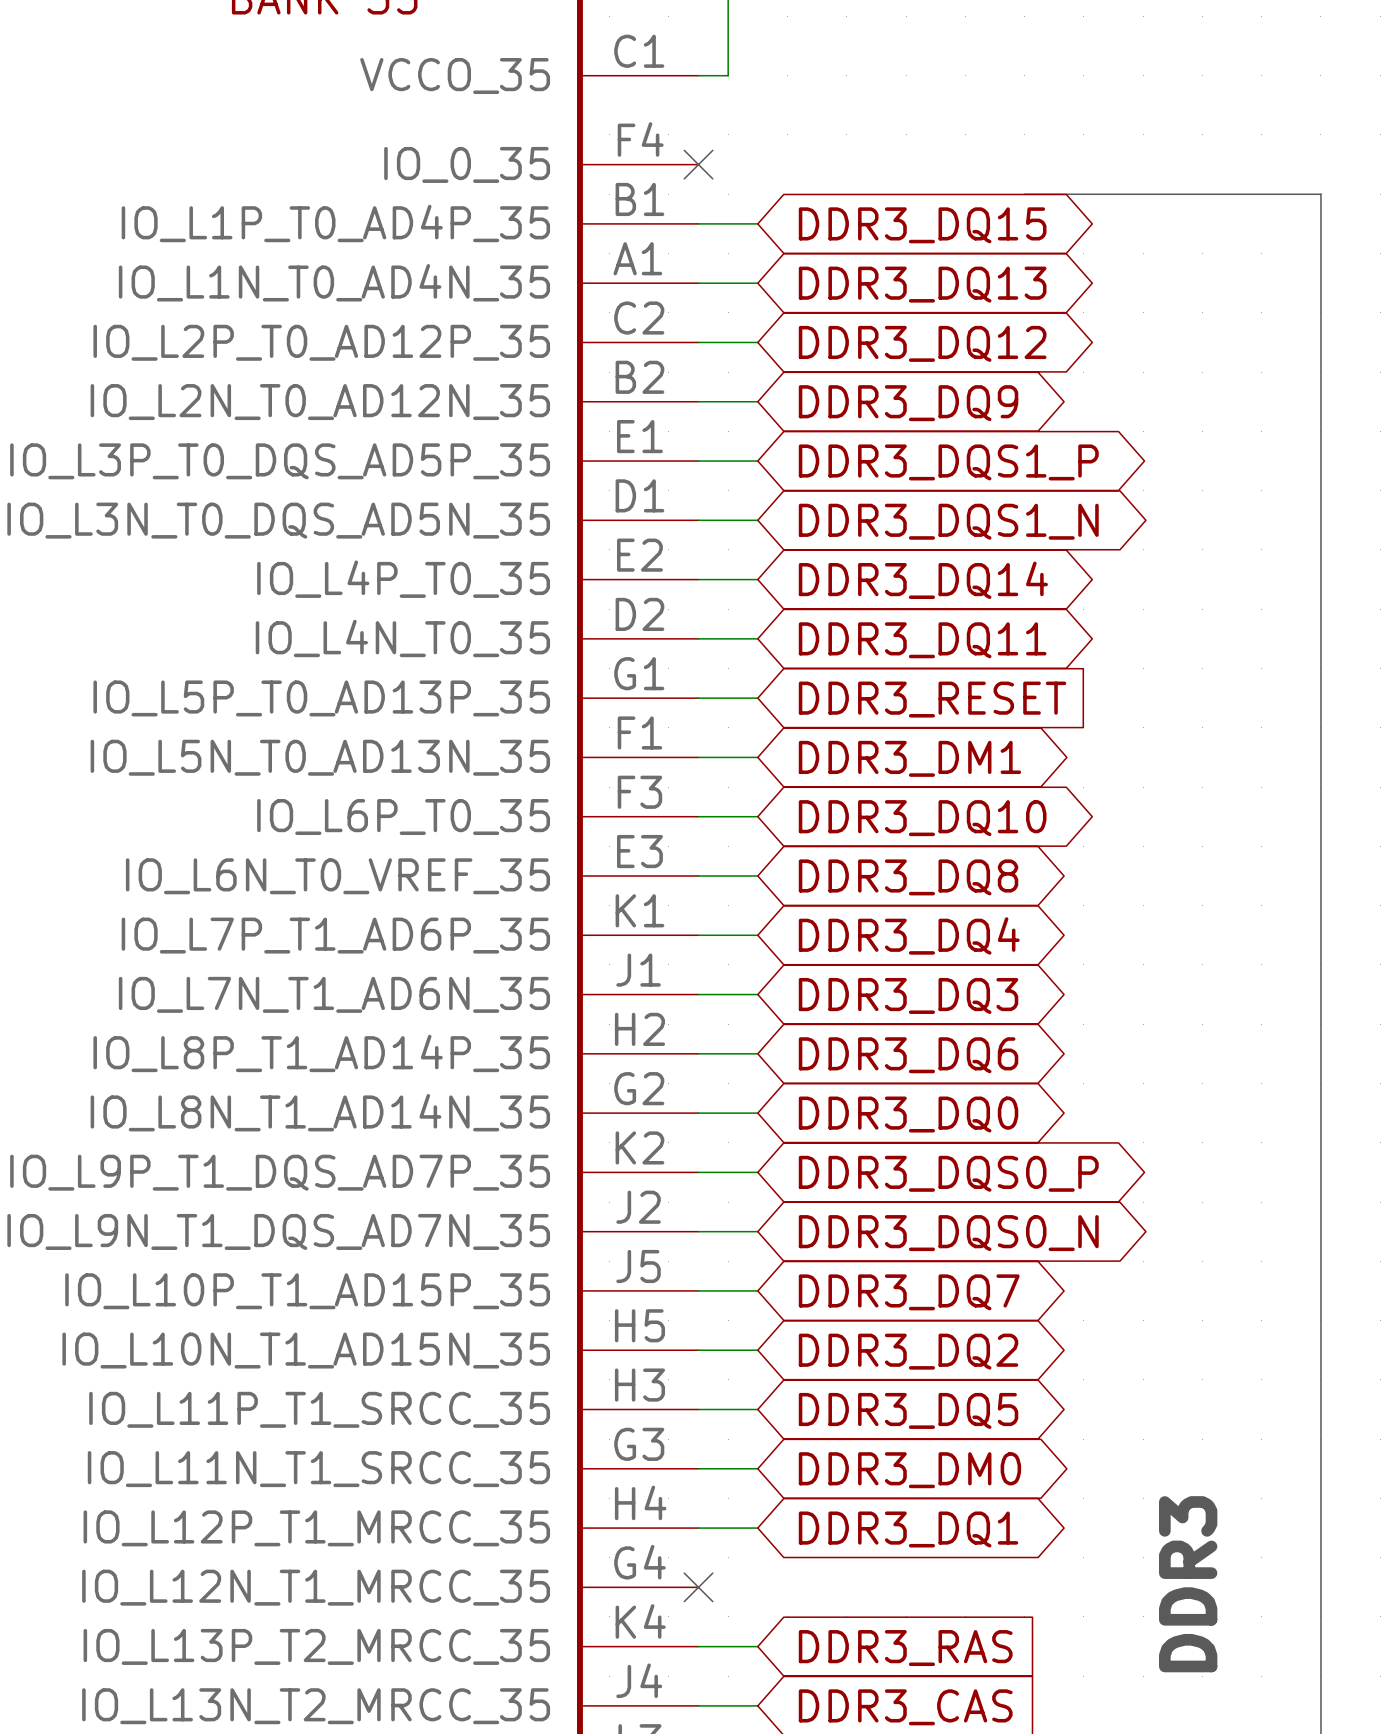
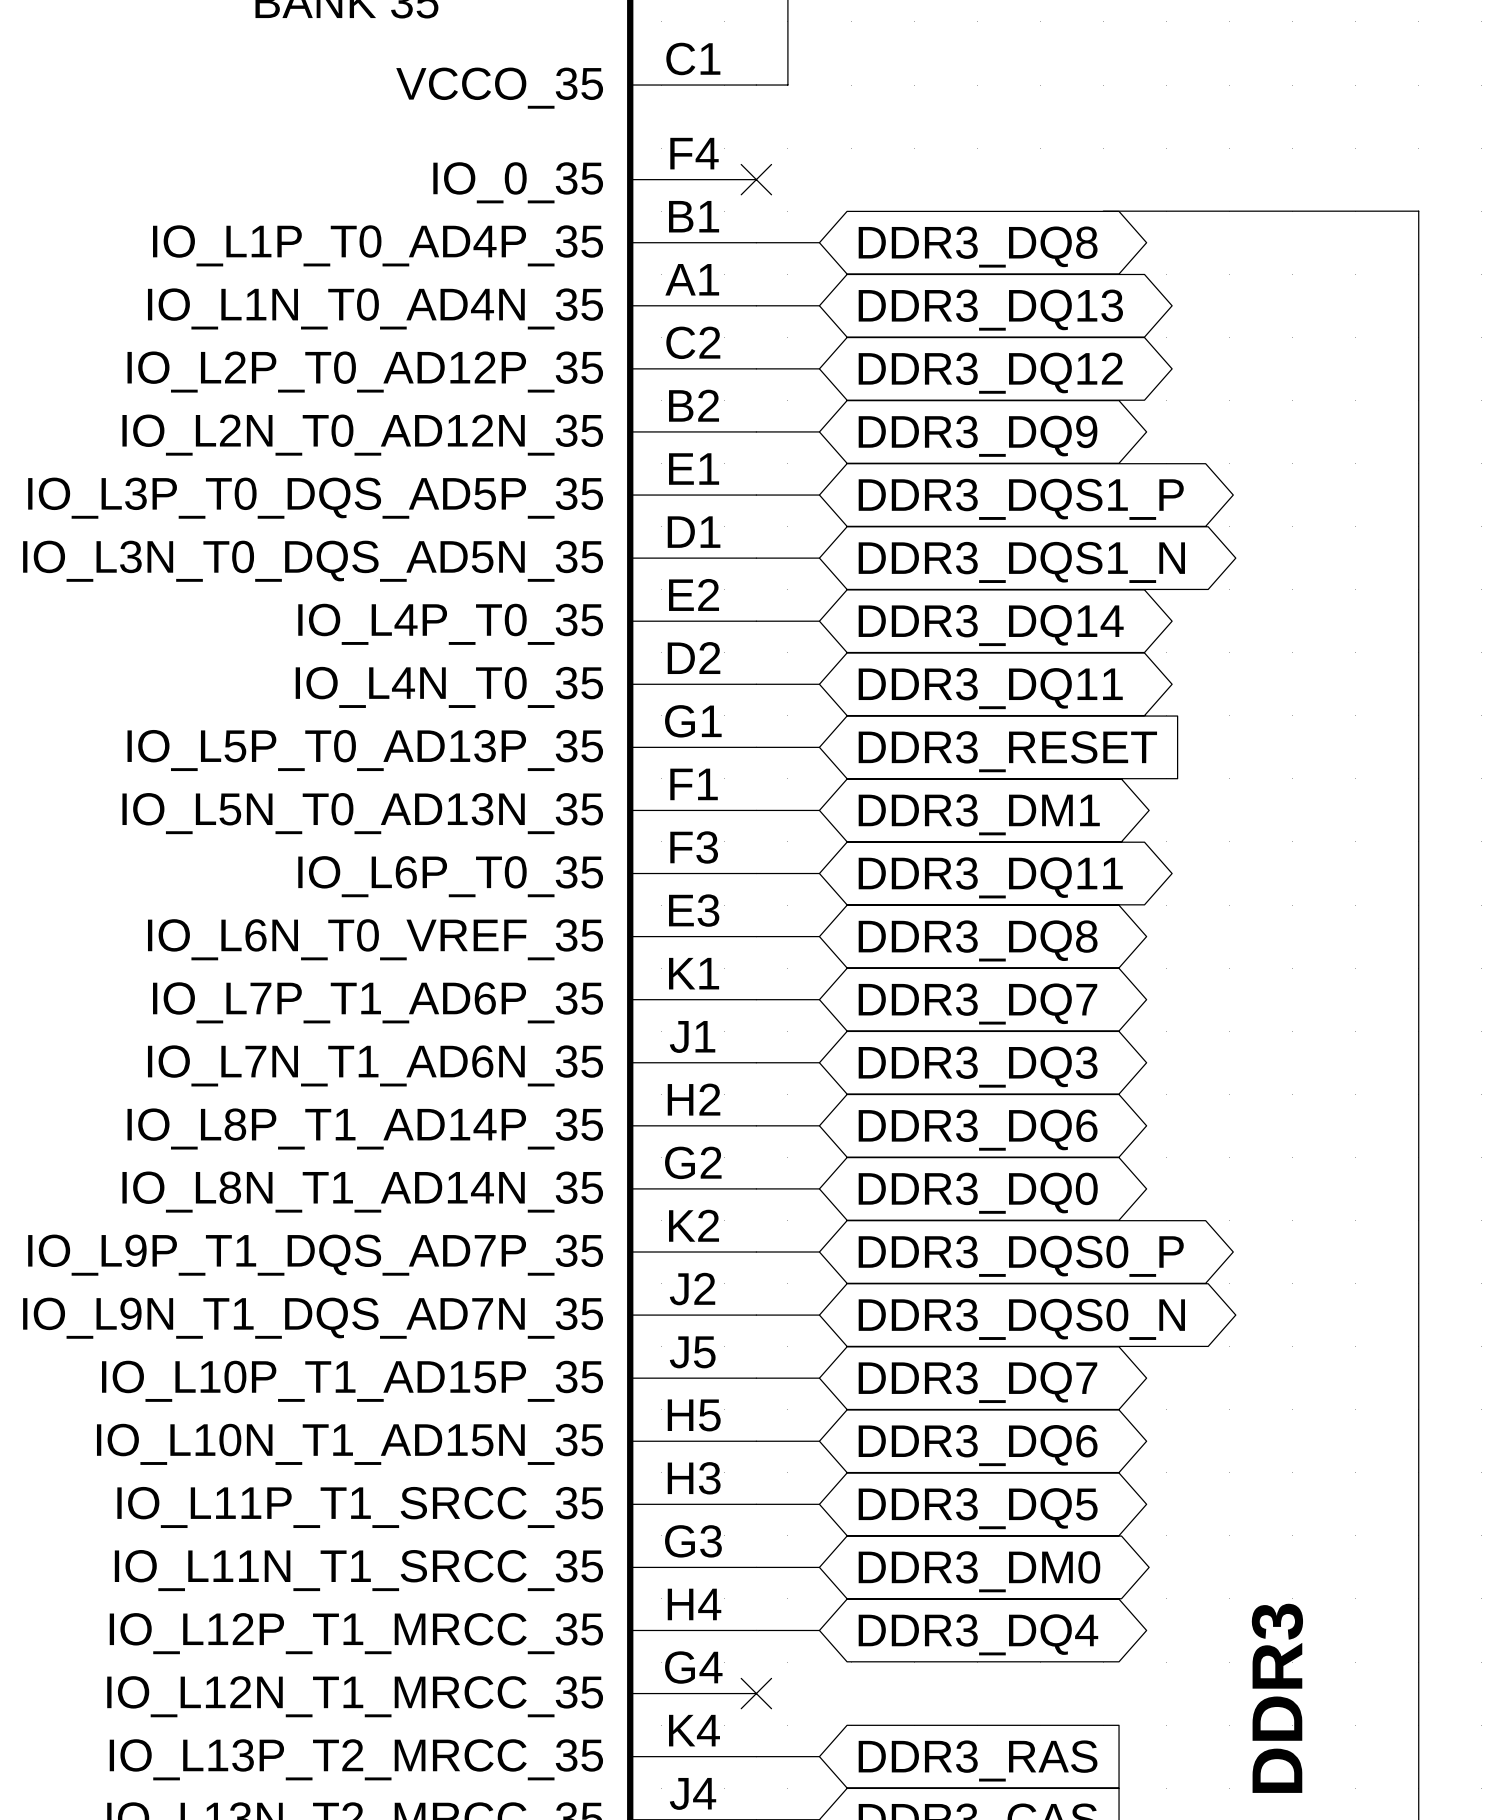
global label: DDR3_DQ15 (922, 225) -> DDR3_DQ8 (978, 247)
global label: DDR3_DQ10 (922, 818) -> DDR3_DQ11 (990, 877)
global label: DDR3_DQ4 (909, 935) -> DDR3_DQ7 (977, 1004)
global label: DDR3_DQ2 (908, 1351) -> DDR3_DQ6 (978, 1445)
global label: DDR3_DQ1 (908, 1529) -> DDR3_DQ4 (978, 1634)

